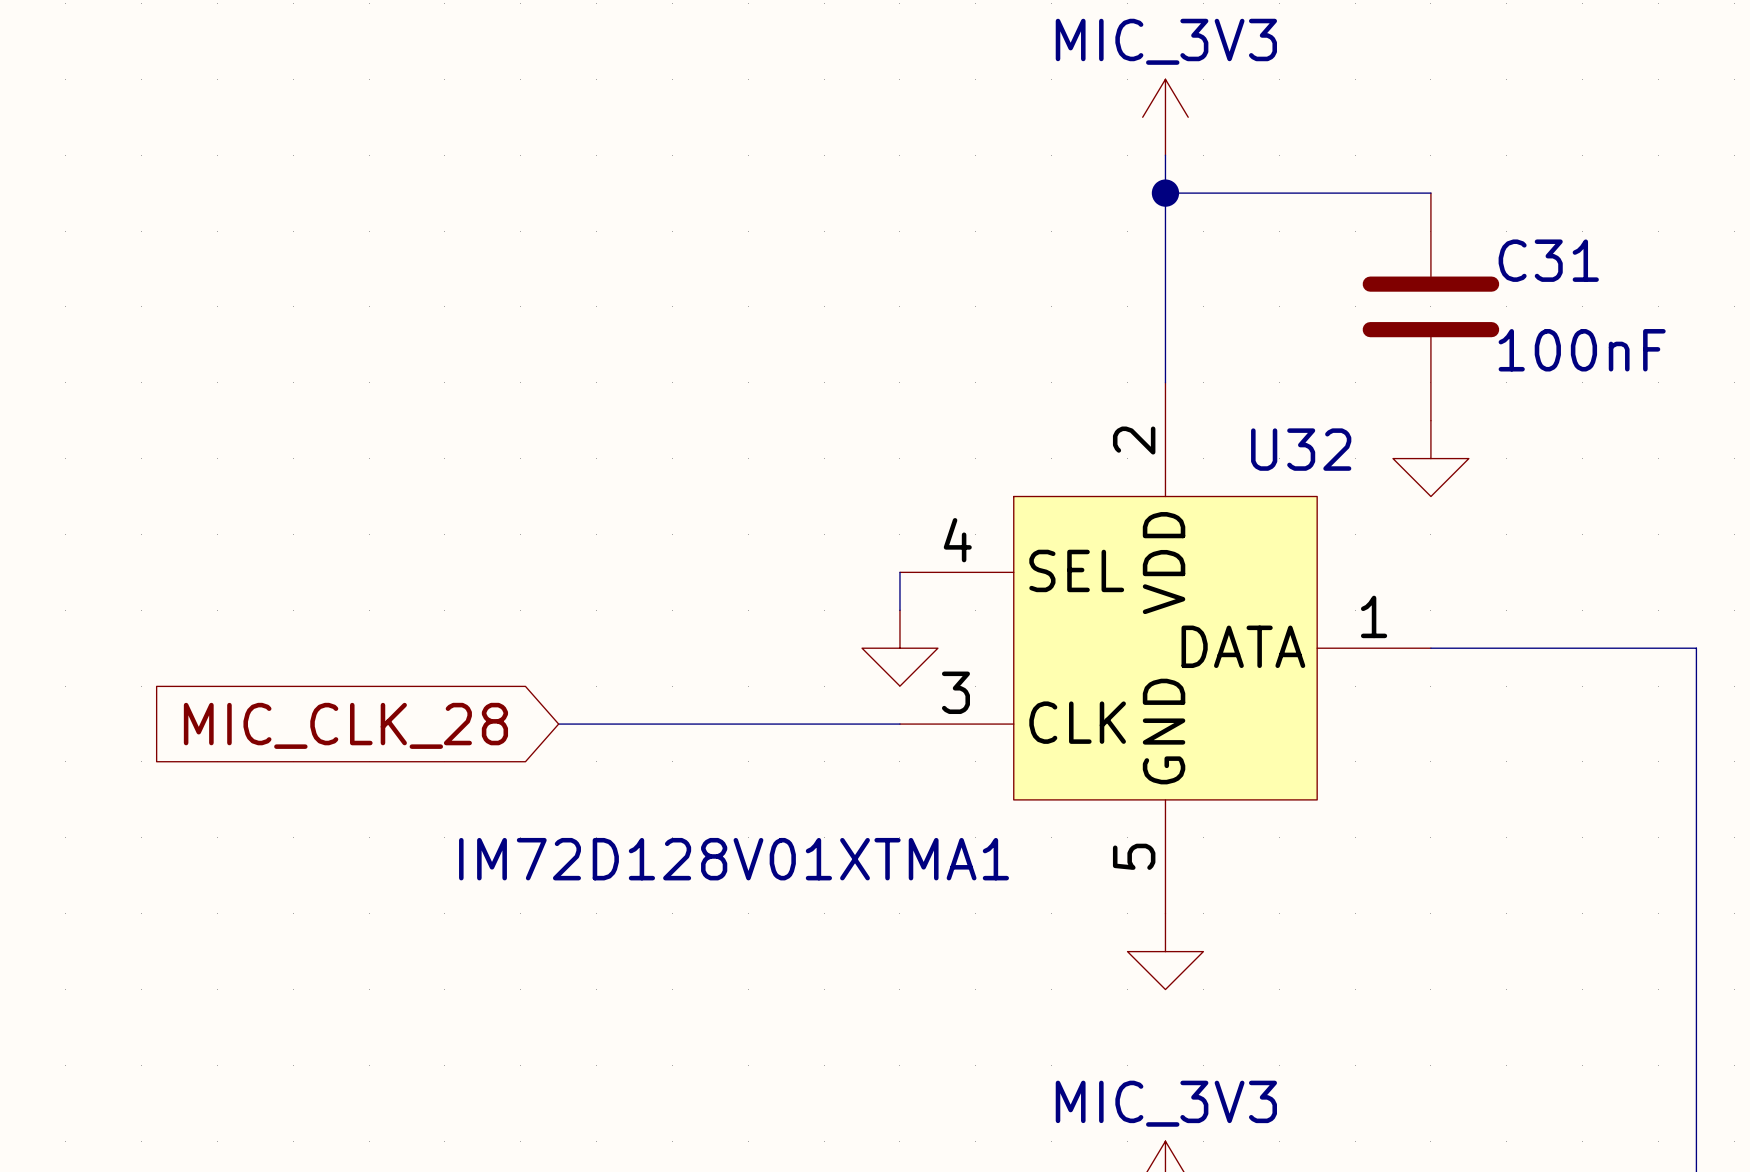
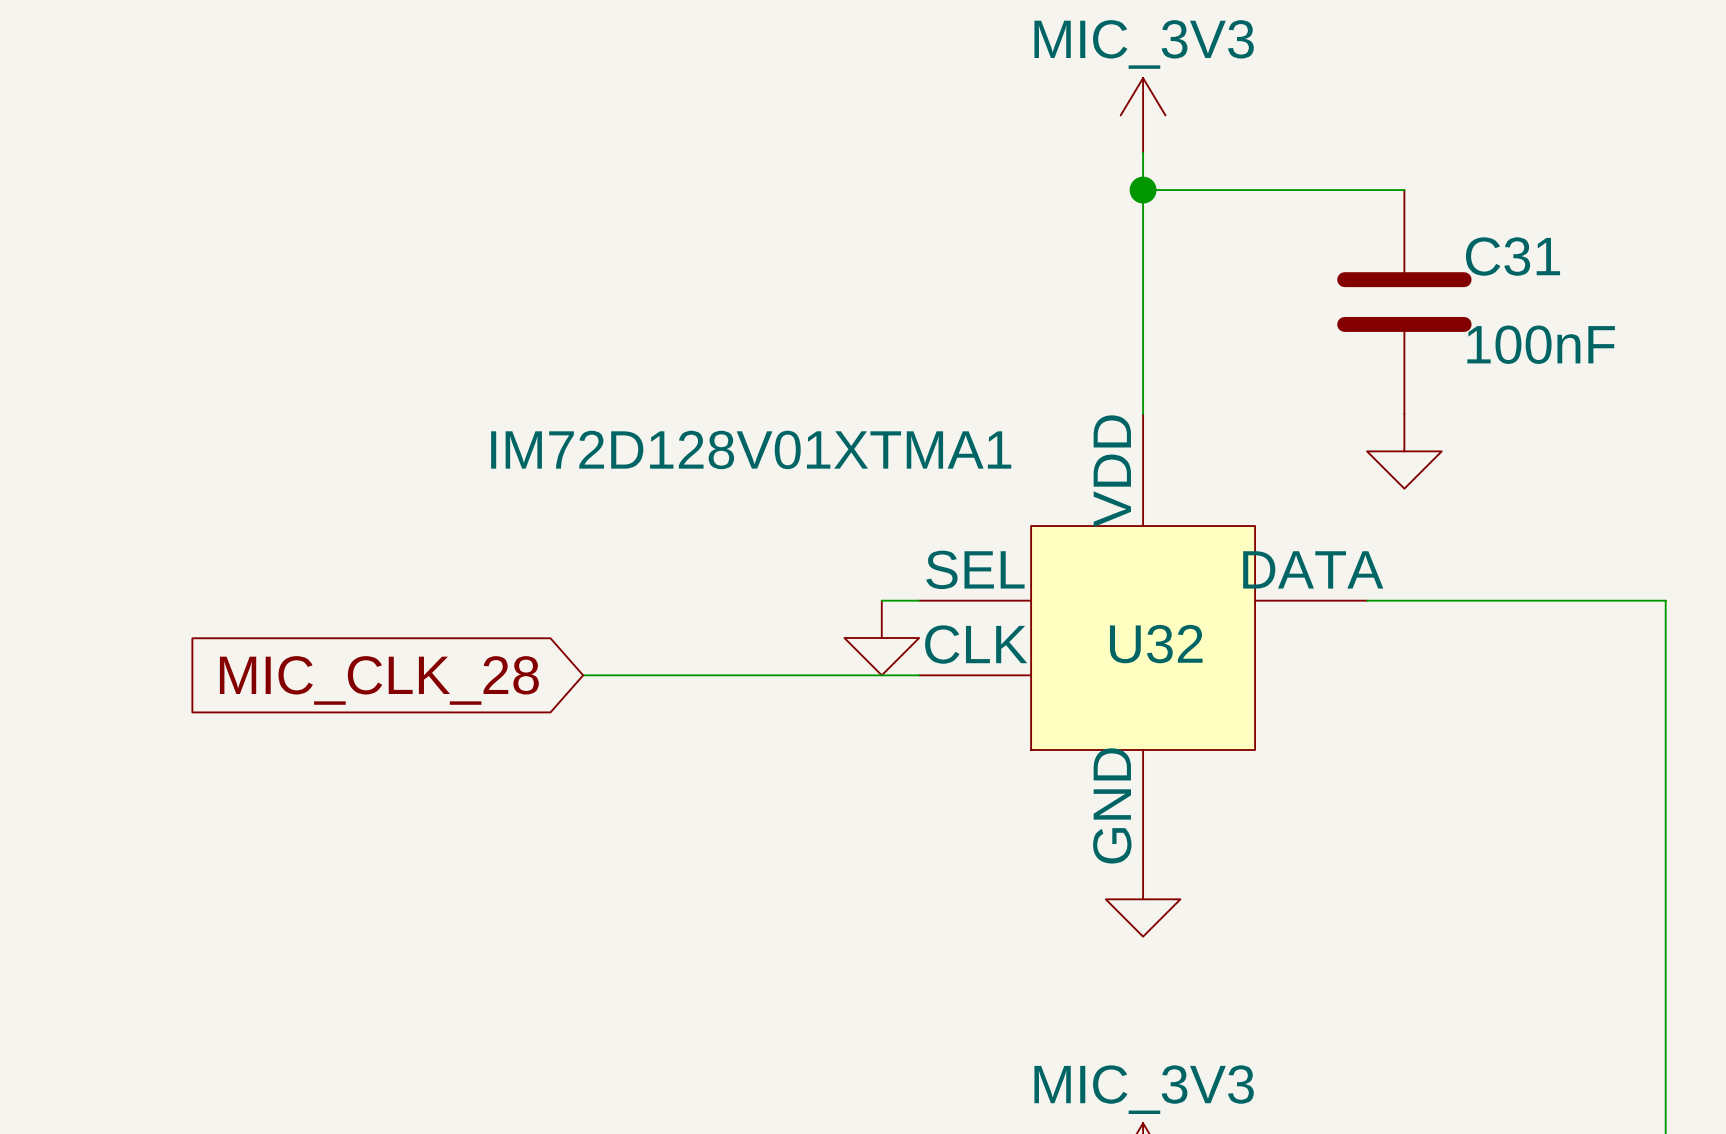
U32 symbol: [899, 382, 1431, 914] -> [919, 414, 1368, 862]
U32 name position: U32 (1301, 449) -> U32 (1156, 644)
wire: (899, 572) (899, 610) -> (919, 600) (881, 600)
wire: (1430, 648) (1696, 648) -> (1367, 600) (1665, 600) (1665, 638)
wire: (558, 724) (899, 724) -> (583, 675) (919, 675)
global label position: MIC_CLK_28 (345, 725) -> MIC_CLK_28 (379, 680)
U32 value position: IM72D128V01XTMA1 (734, 859) -> IM72D128V01XTMA1 (751, 449)
power symbol position: (1165, 951) -> (1143, 899)

